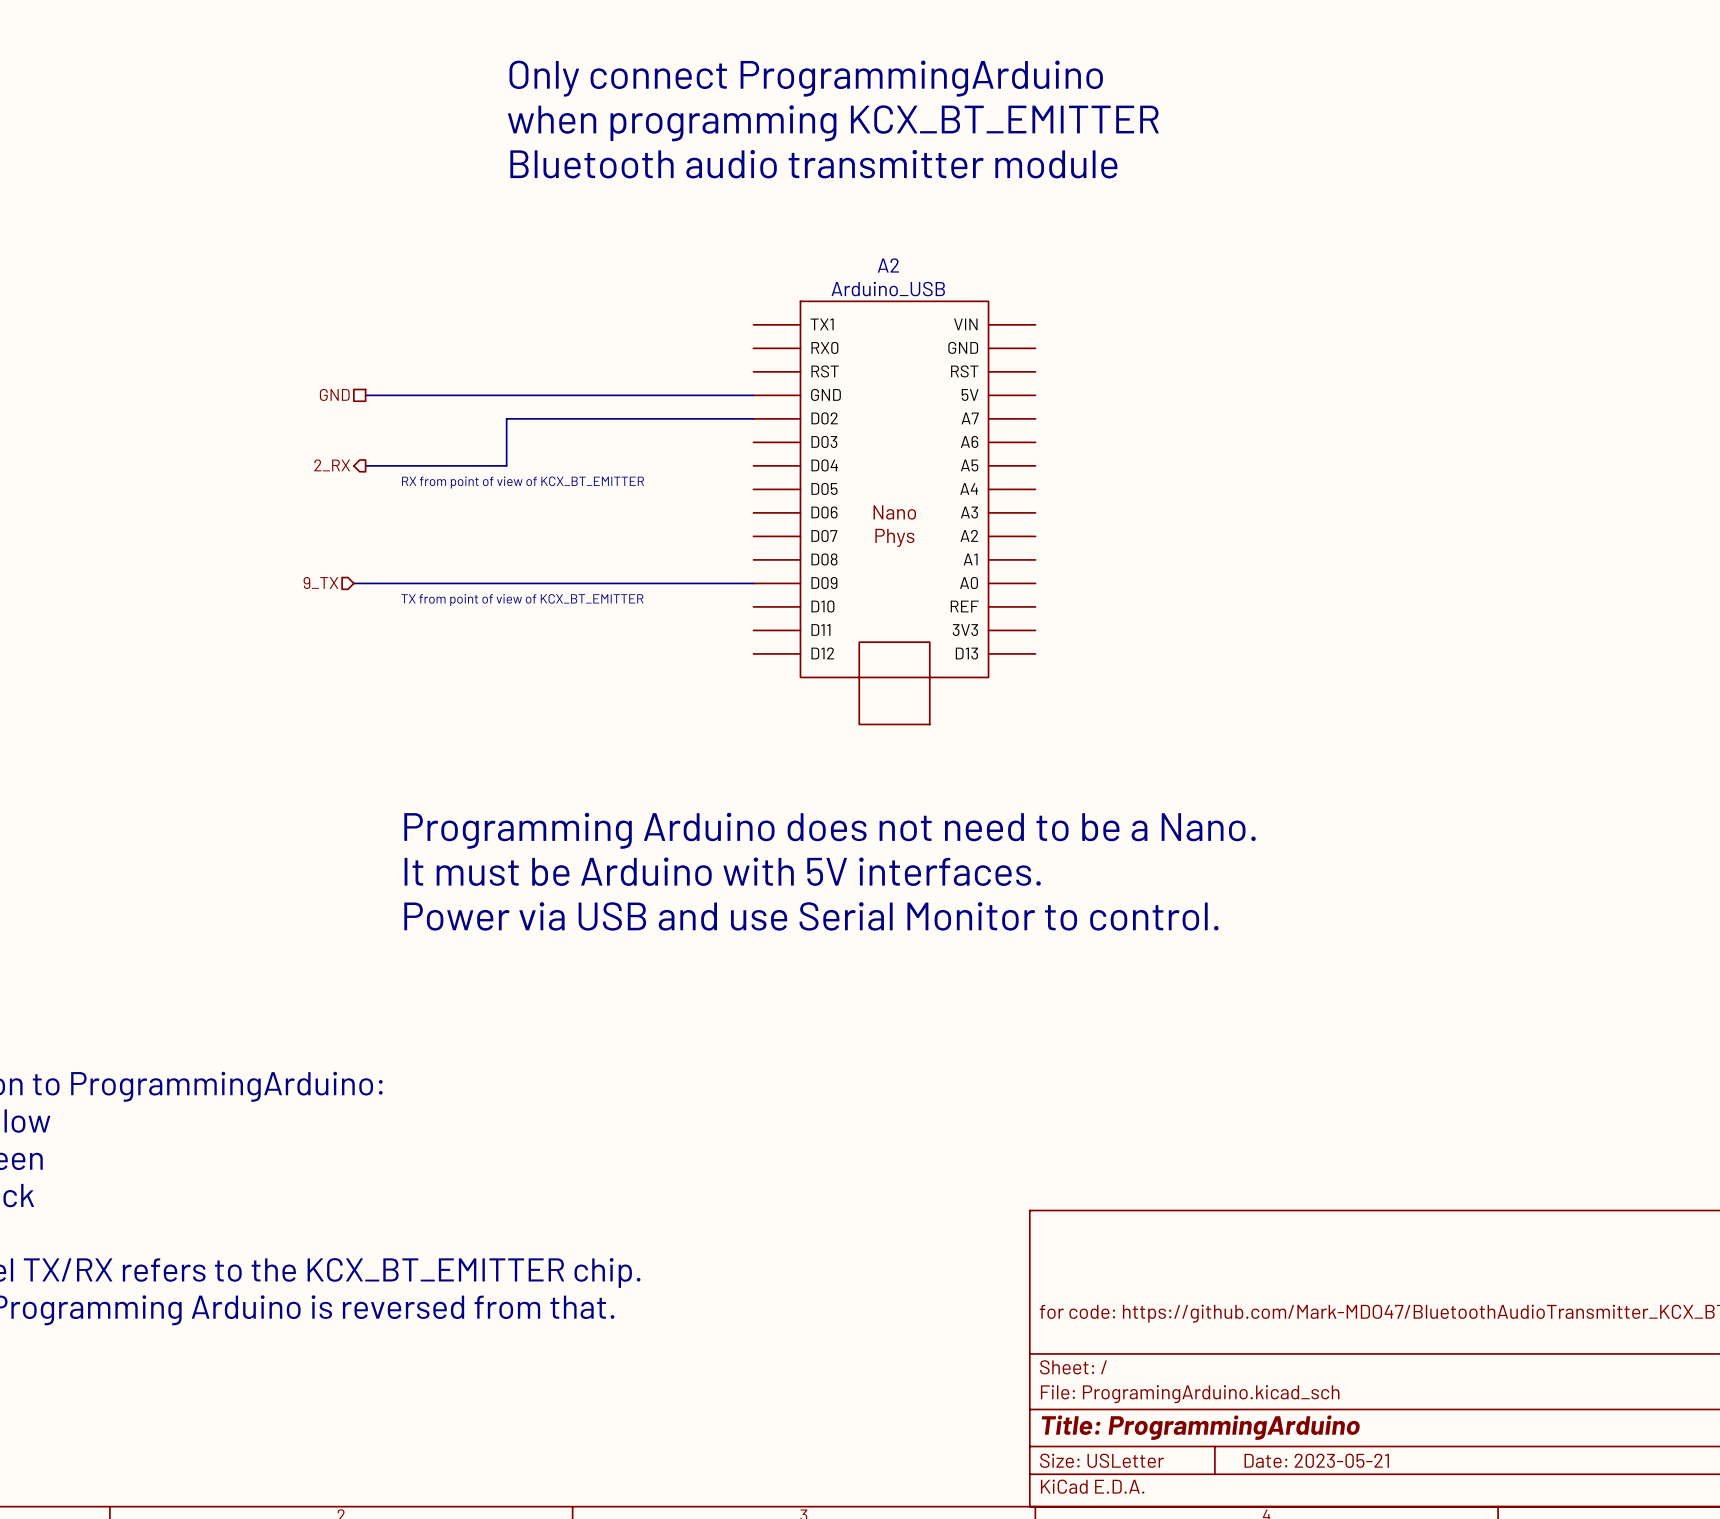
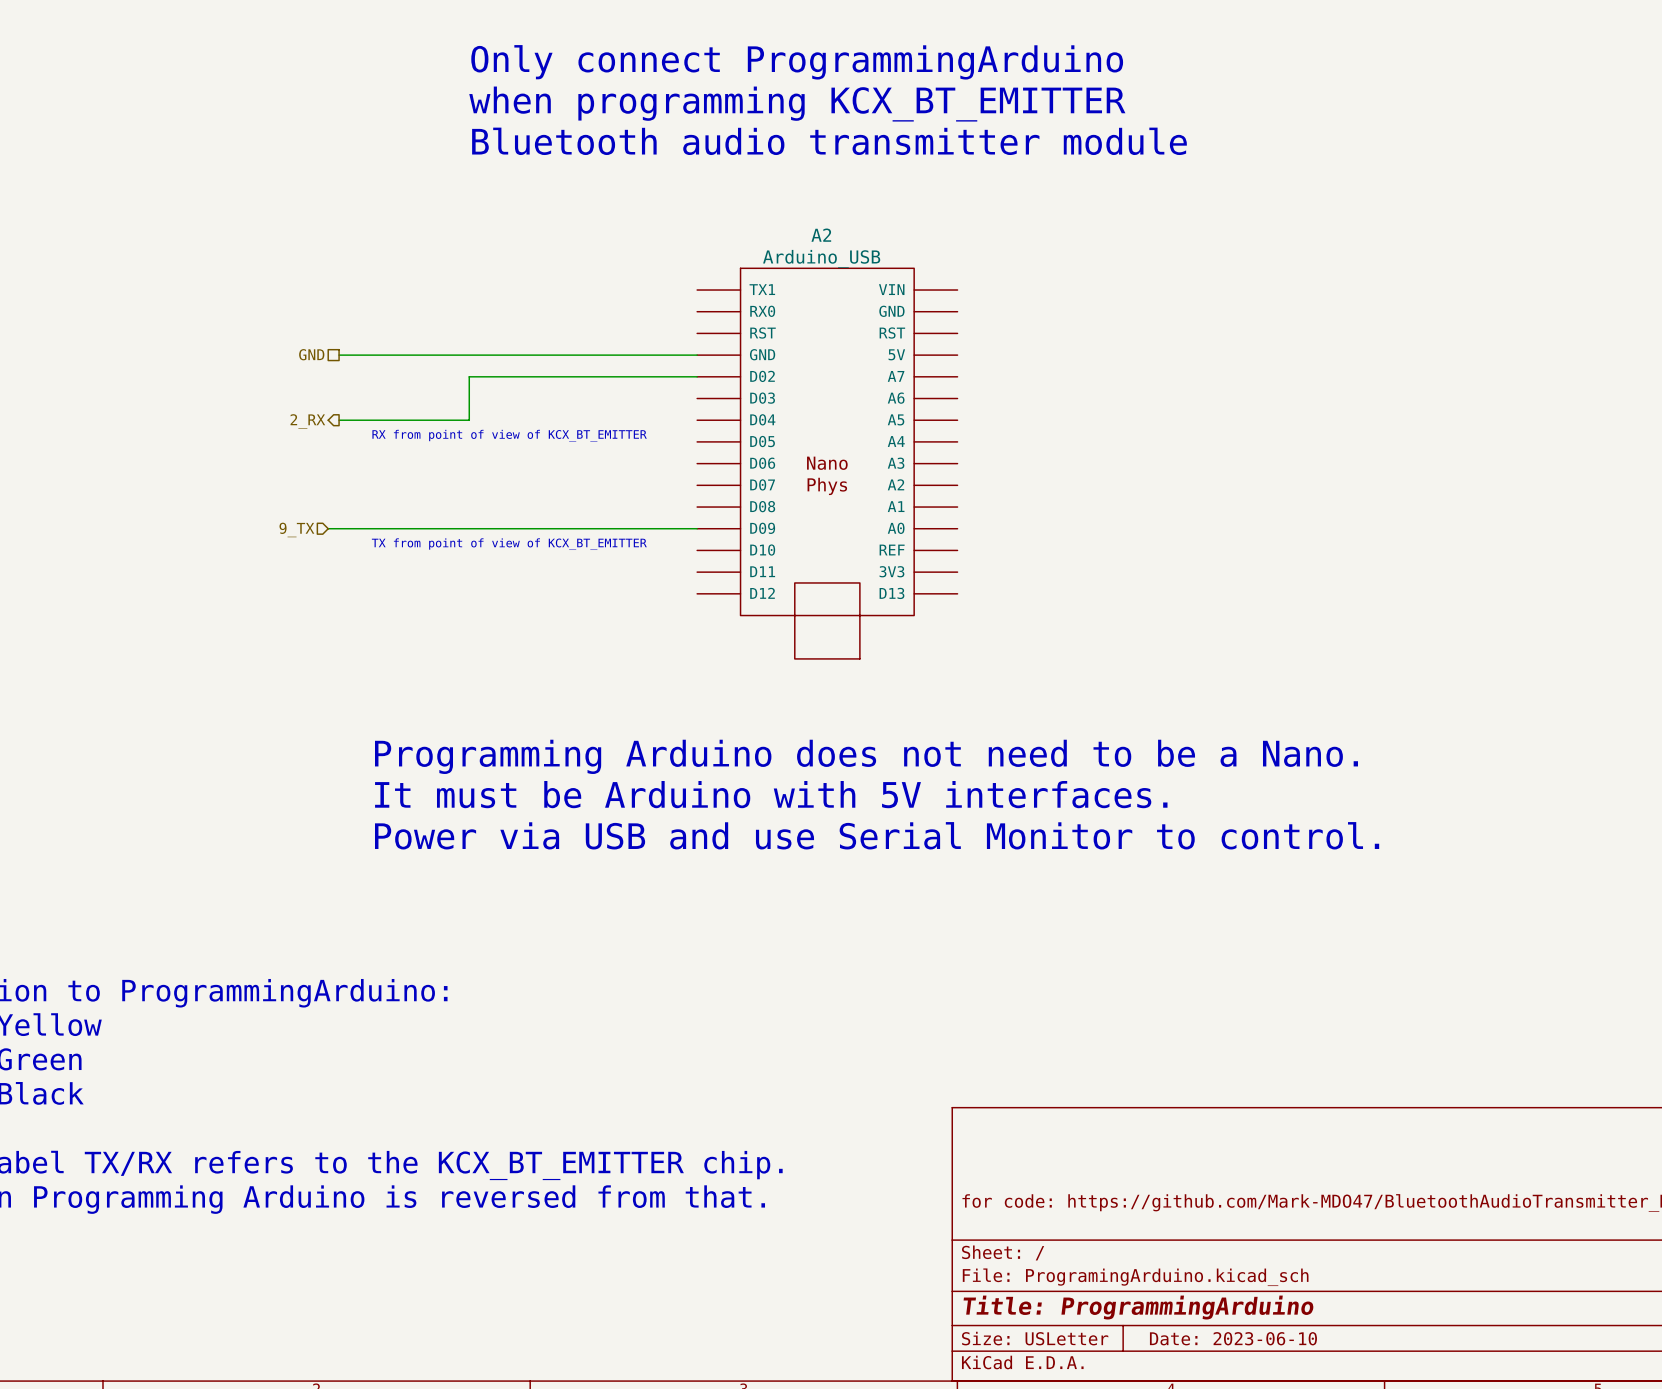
title block: Date: 2023-05-21 (1316, 1460) -> Date: 2023-06-10 (1233, 1338)

